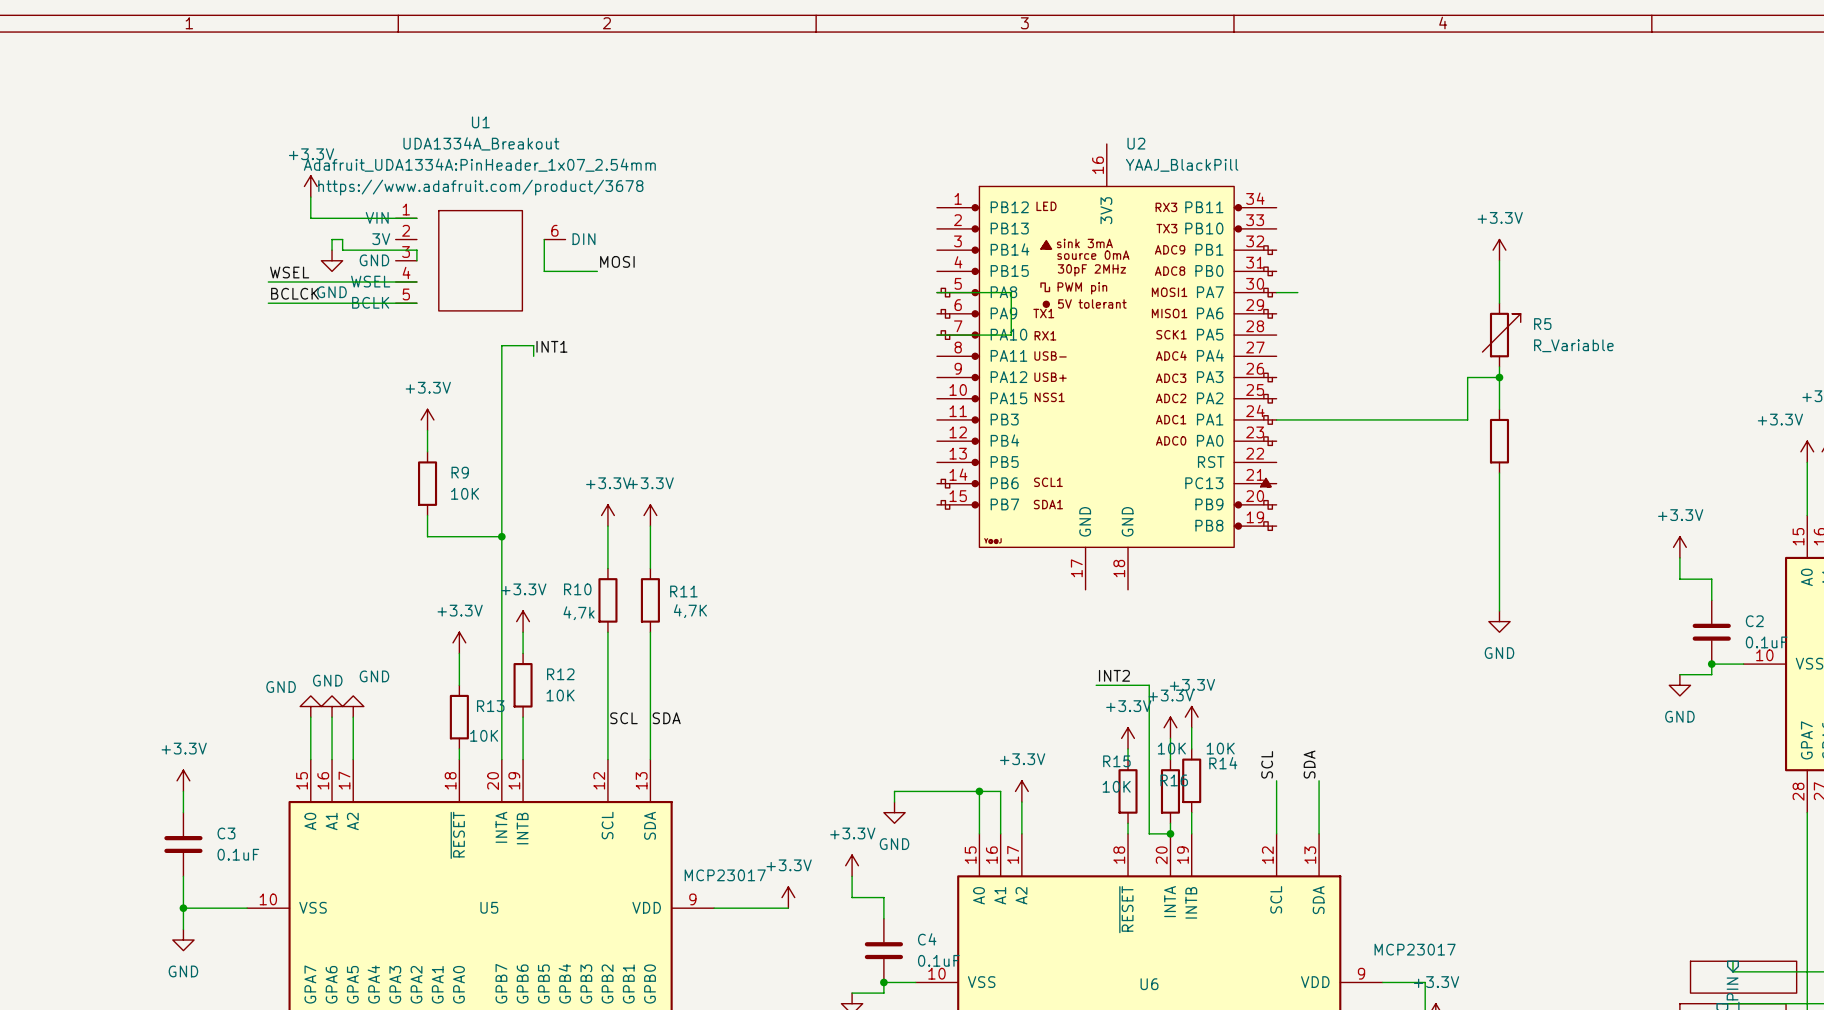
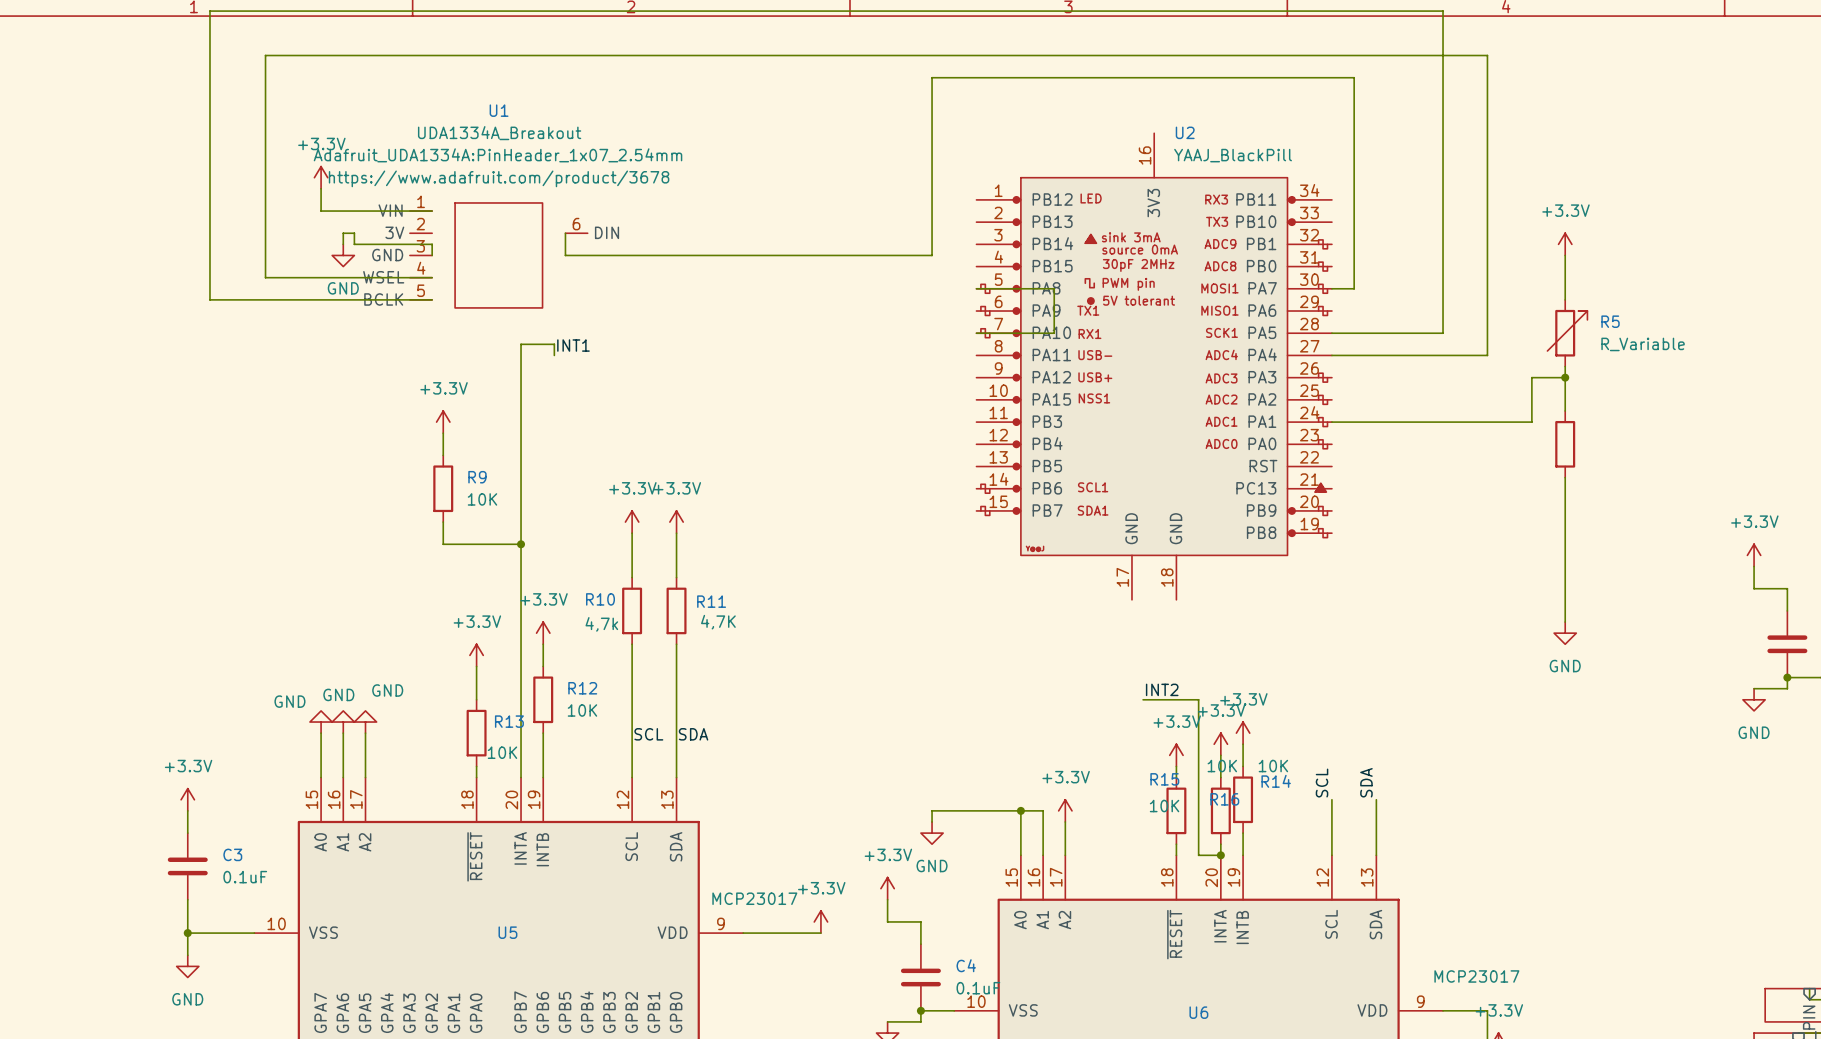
wire: (544, 260) (544, 271) (597, 271) -> (565, 255) (932, 255) (932, 77) (1354, 77) (1354, 288)
label: MOSI (617, 261) -> none
label: WSEL (289, 272) -> none
wire: none -> (276, 277) (265, 277) (265, 55) (1487, 55) (1487, 355) (1331, 355)
label: BCLCK (294, 293) -> none
wire: none -> (276, 299) (209, 299) (209, 11) (1443, 11) (1443, 333) (1331, 333)

